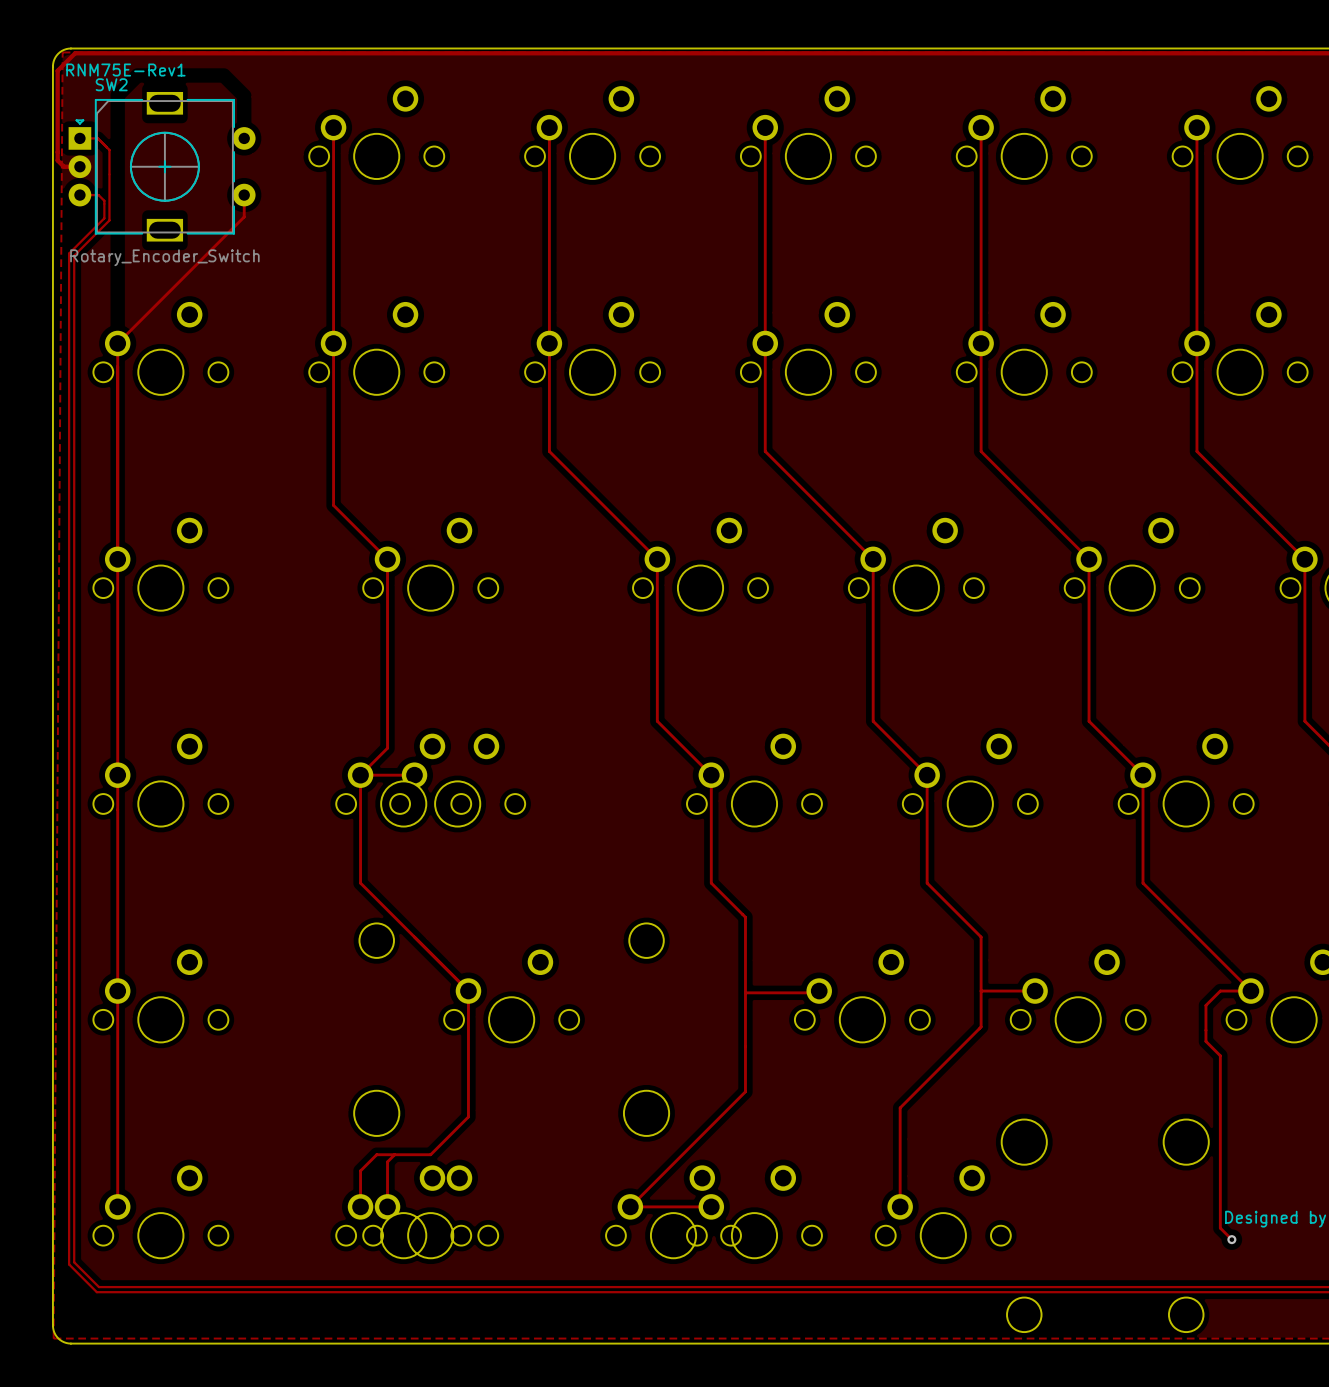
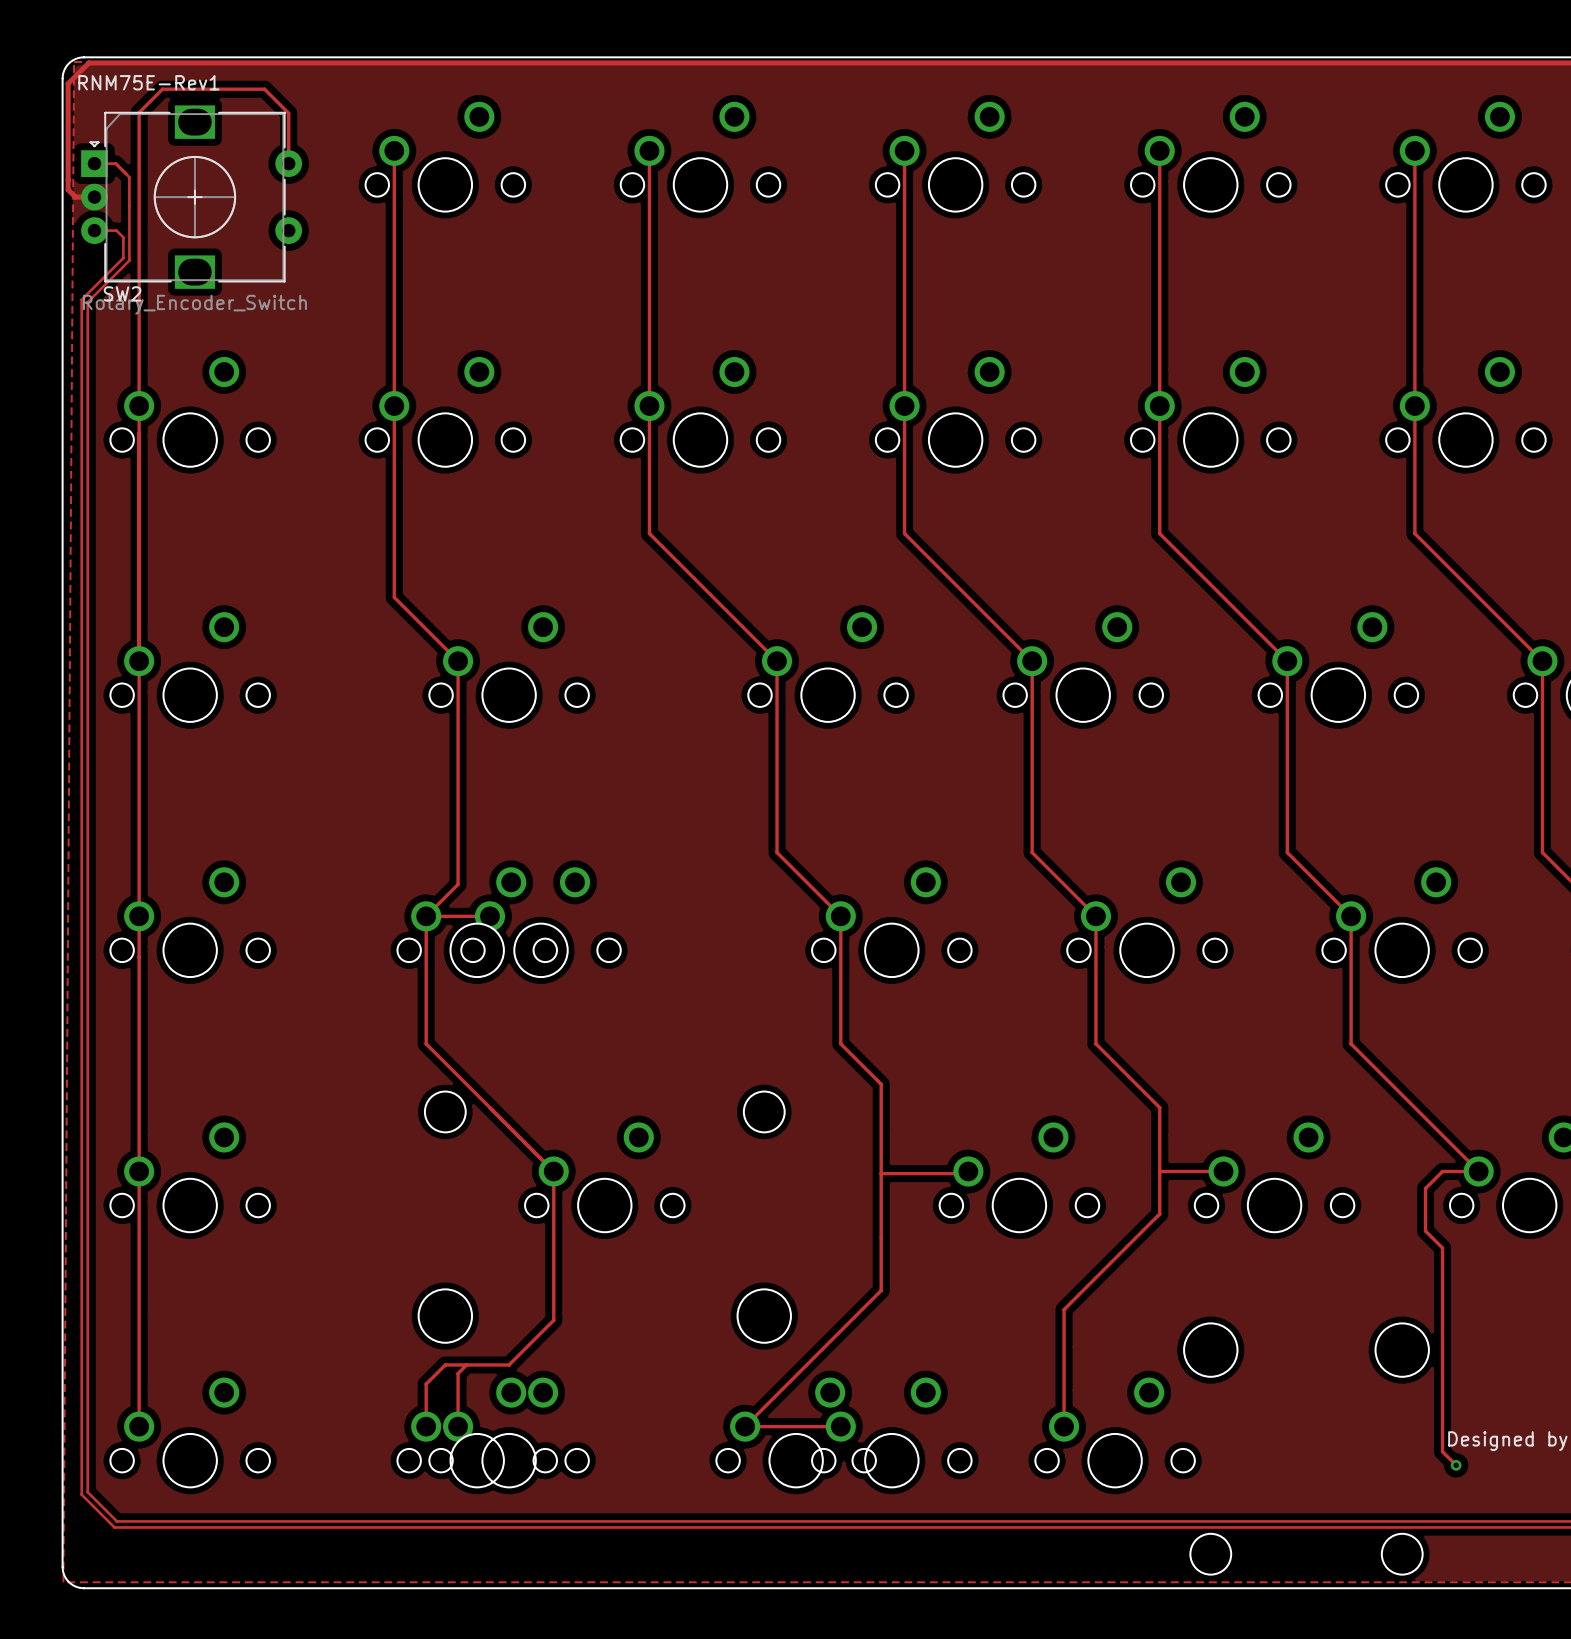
SW2 name position: SW2 (111, 84) -> SW2 (122, 293)
SW2 footprint: [68, 91, 256, 242] -> [81, 105, 303, 289]
track: (244, 195) (244, 216) (117, 343) -> (288, 163) (288, 113) (264, 89) (162, 89) (139, 112) (139, 406)

